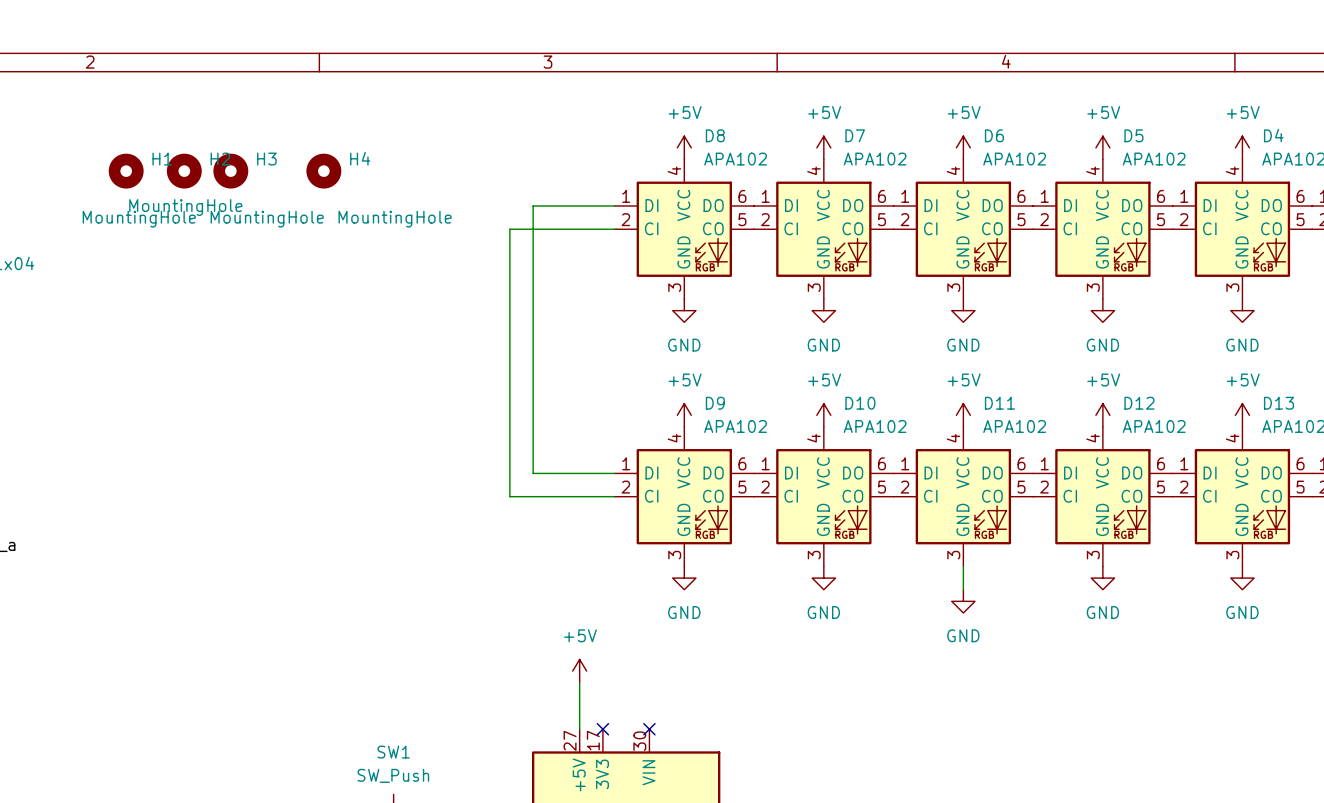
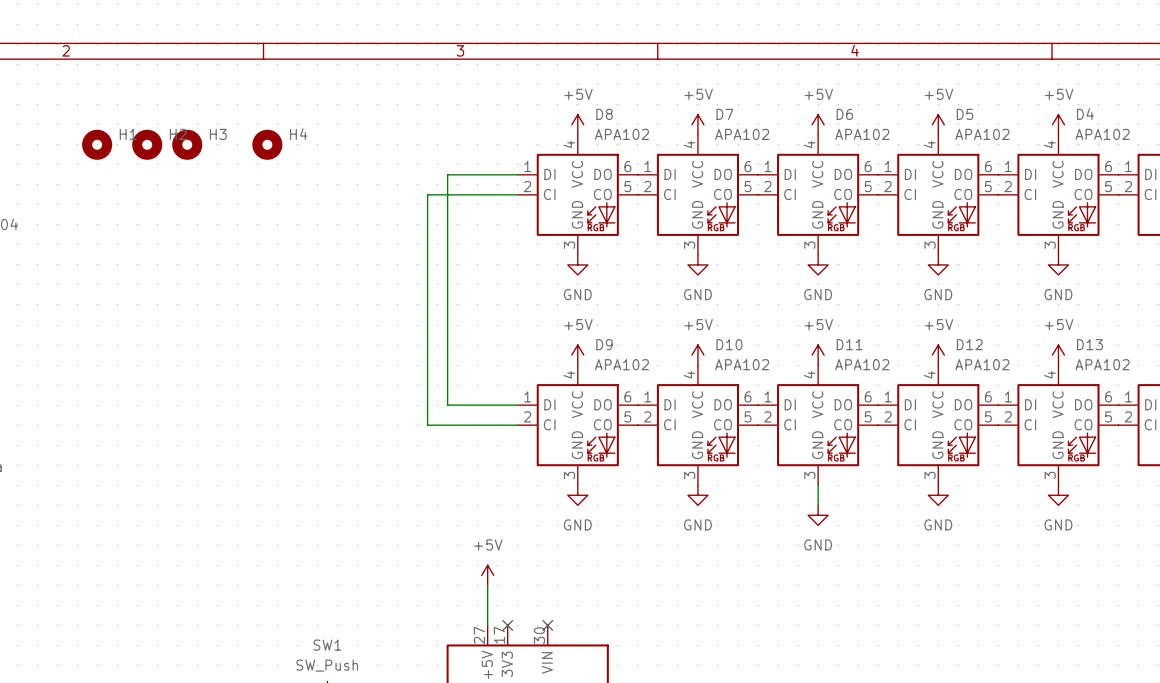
H2 value: MountingHole (185, 207) -> none
H1 value: MountingHole (139, 219) -> none
H3 value: MountingHole (267, 219) -> none
H4 value: MountingHole (395, 219) -> none

